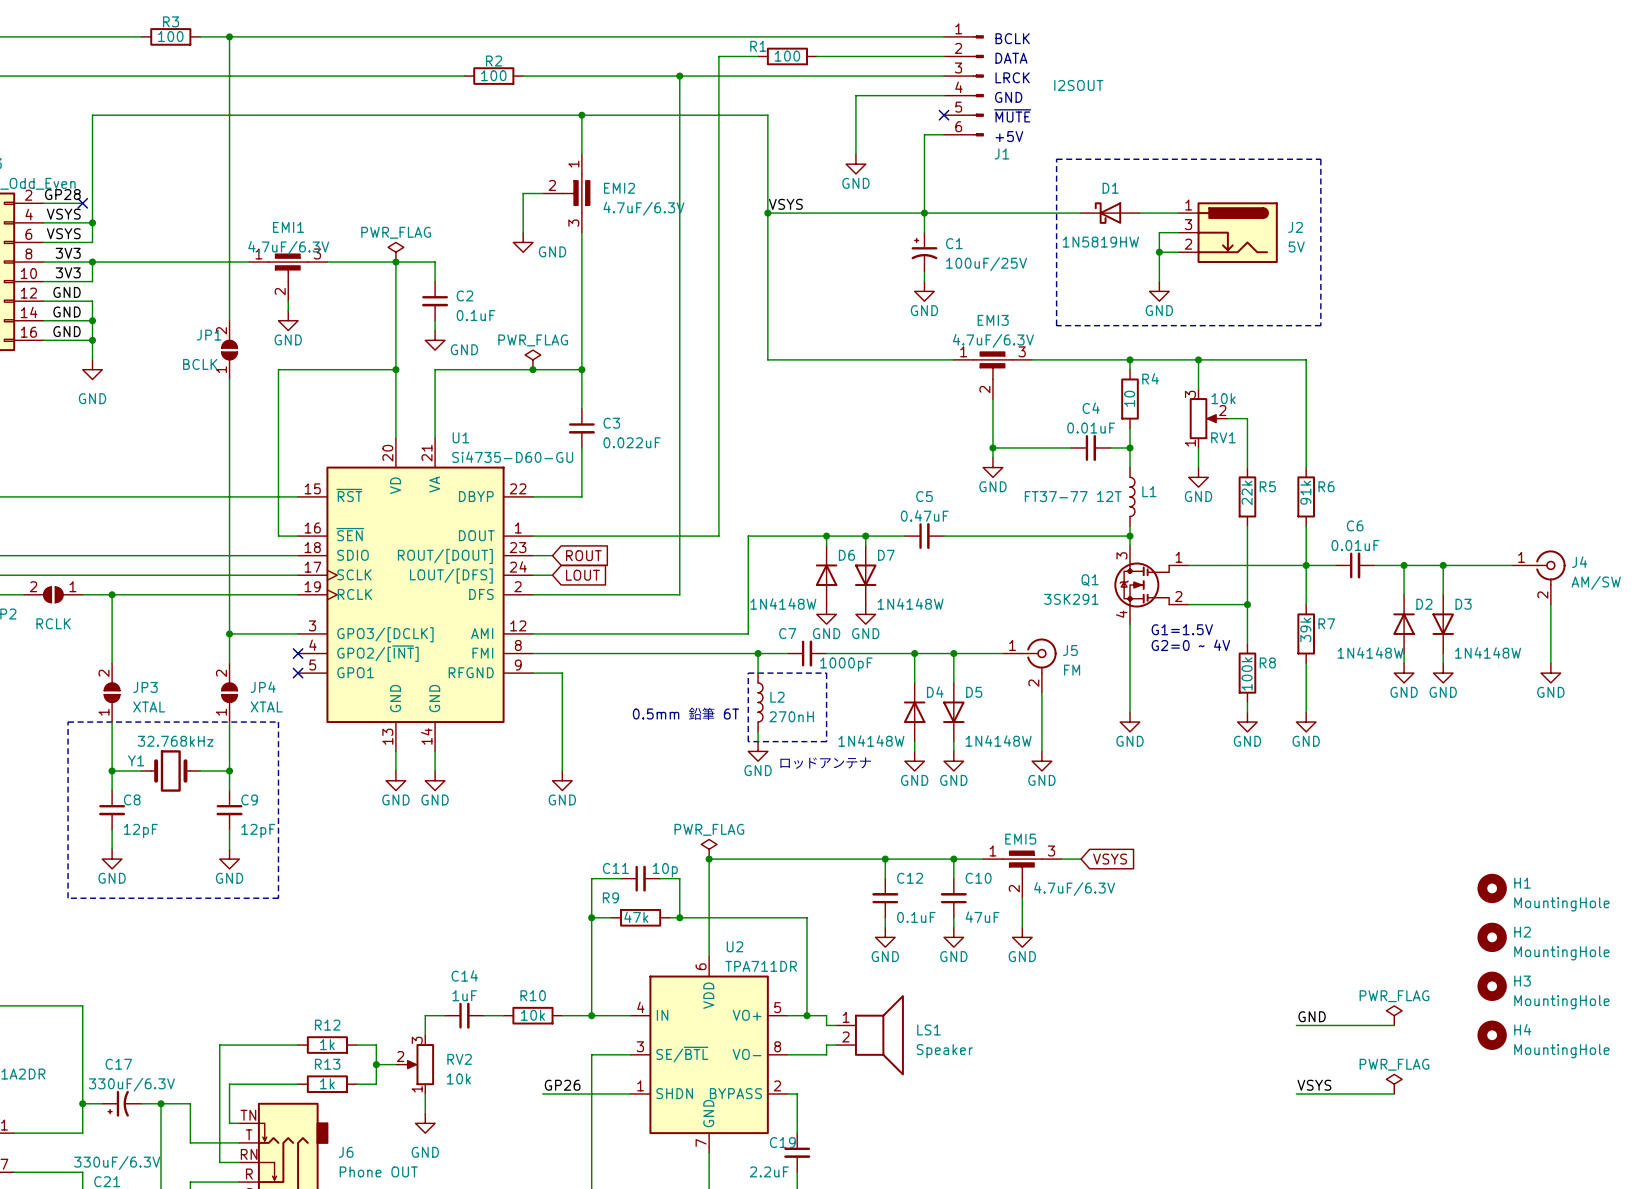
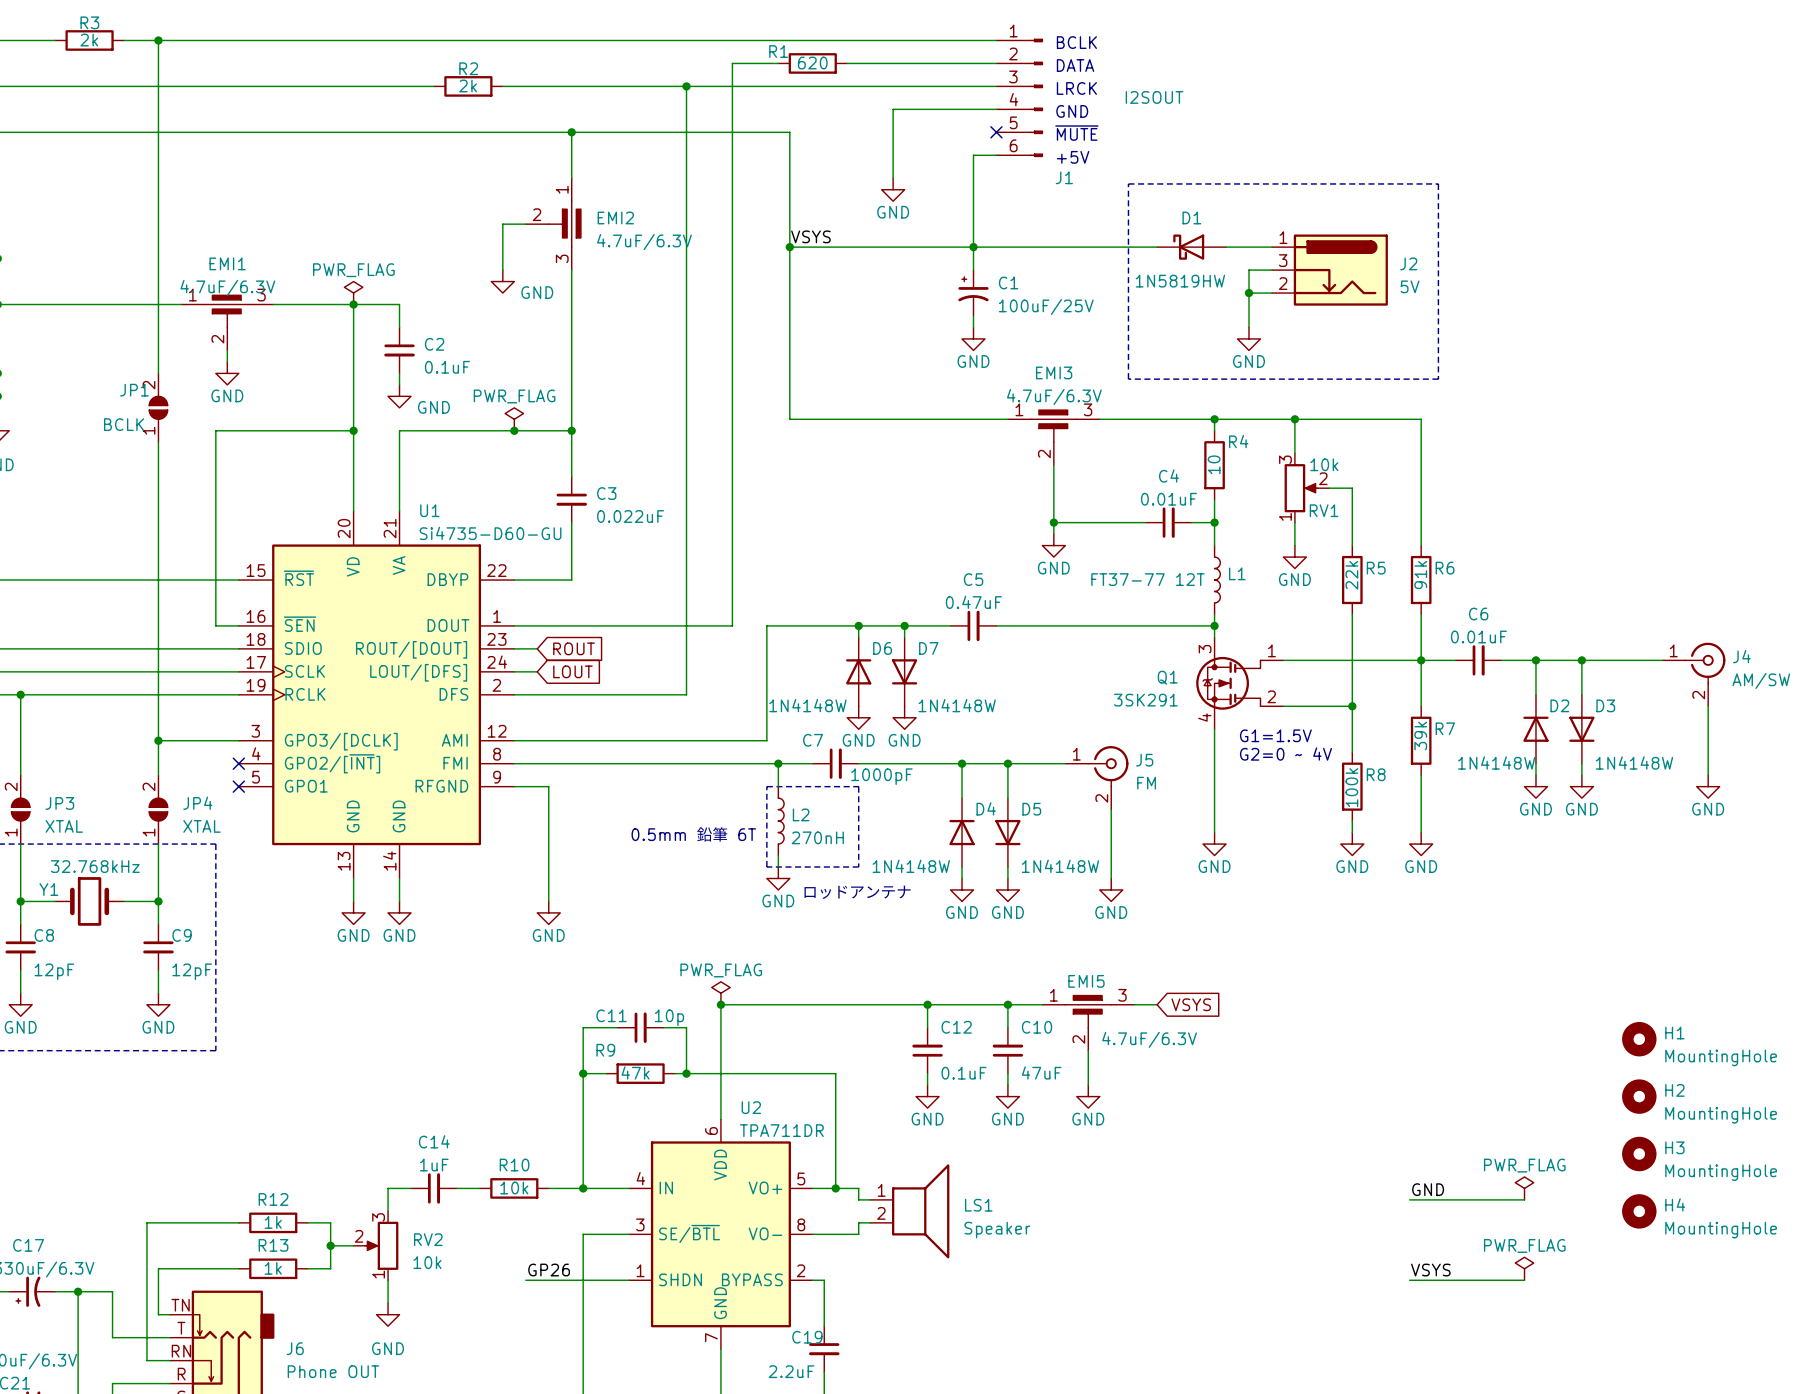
R3 value: 100 (170, 36) -> 2k (89, 40)
R1 value: 100 (787, 56) -> 620 (812, 63)
R2 value: 100 (493, 75) -> 2k (468, 85)

